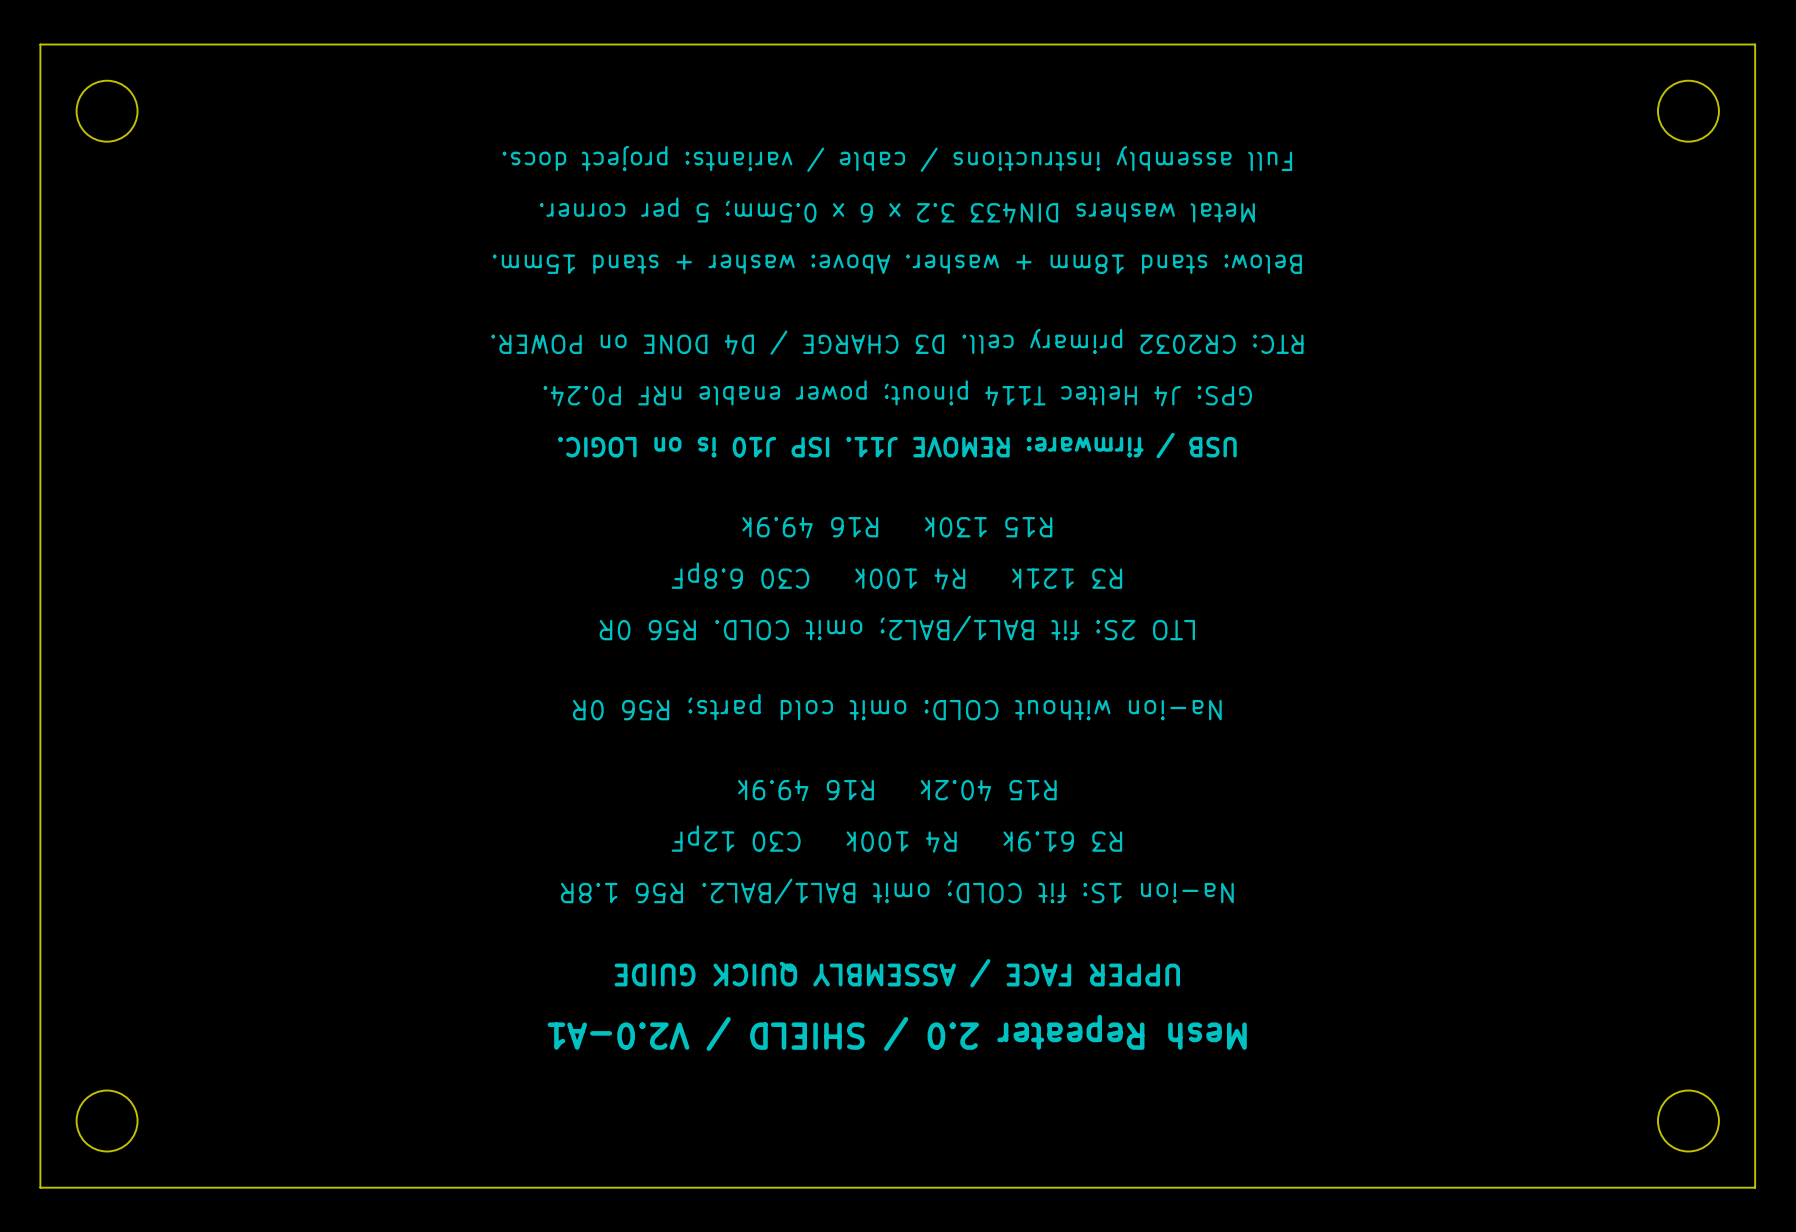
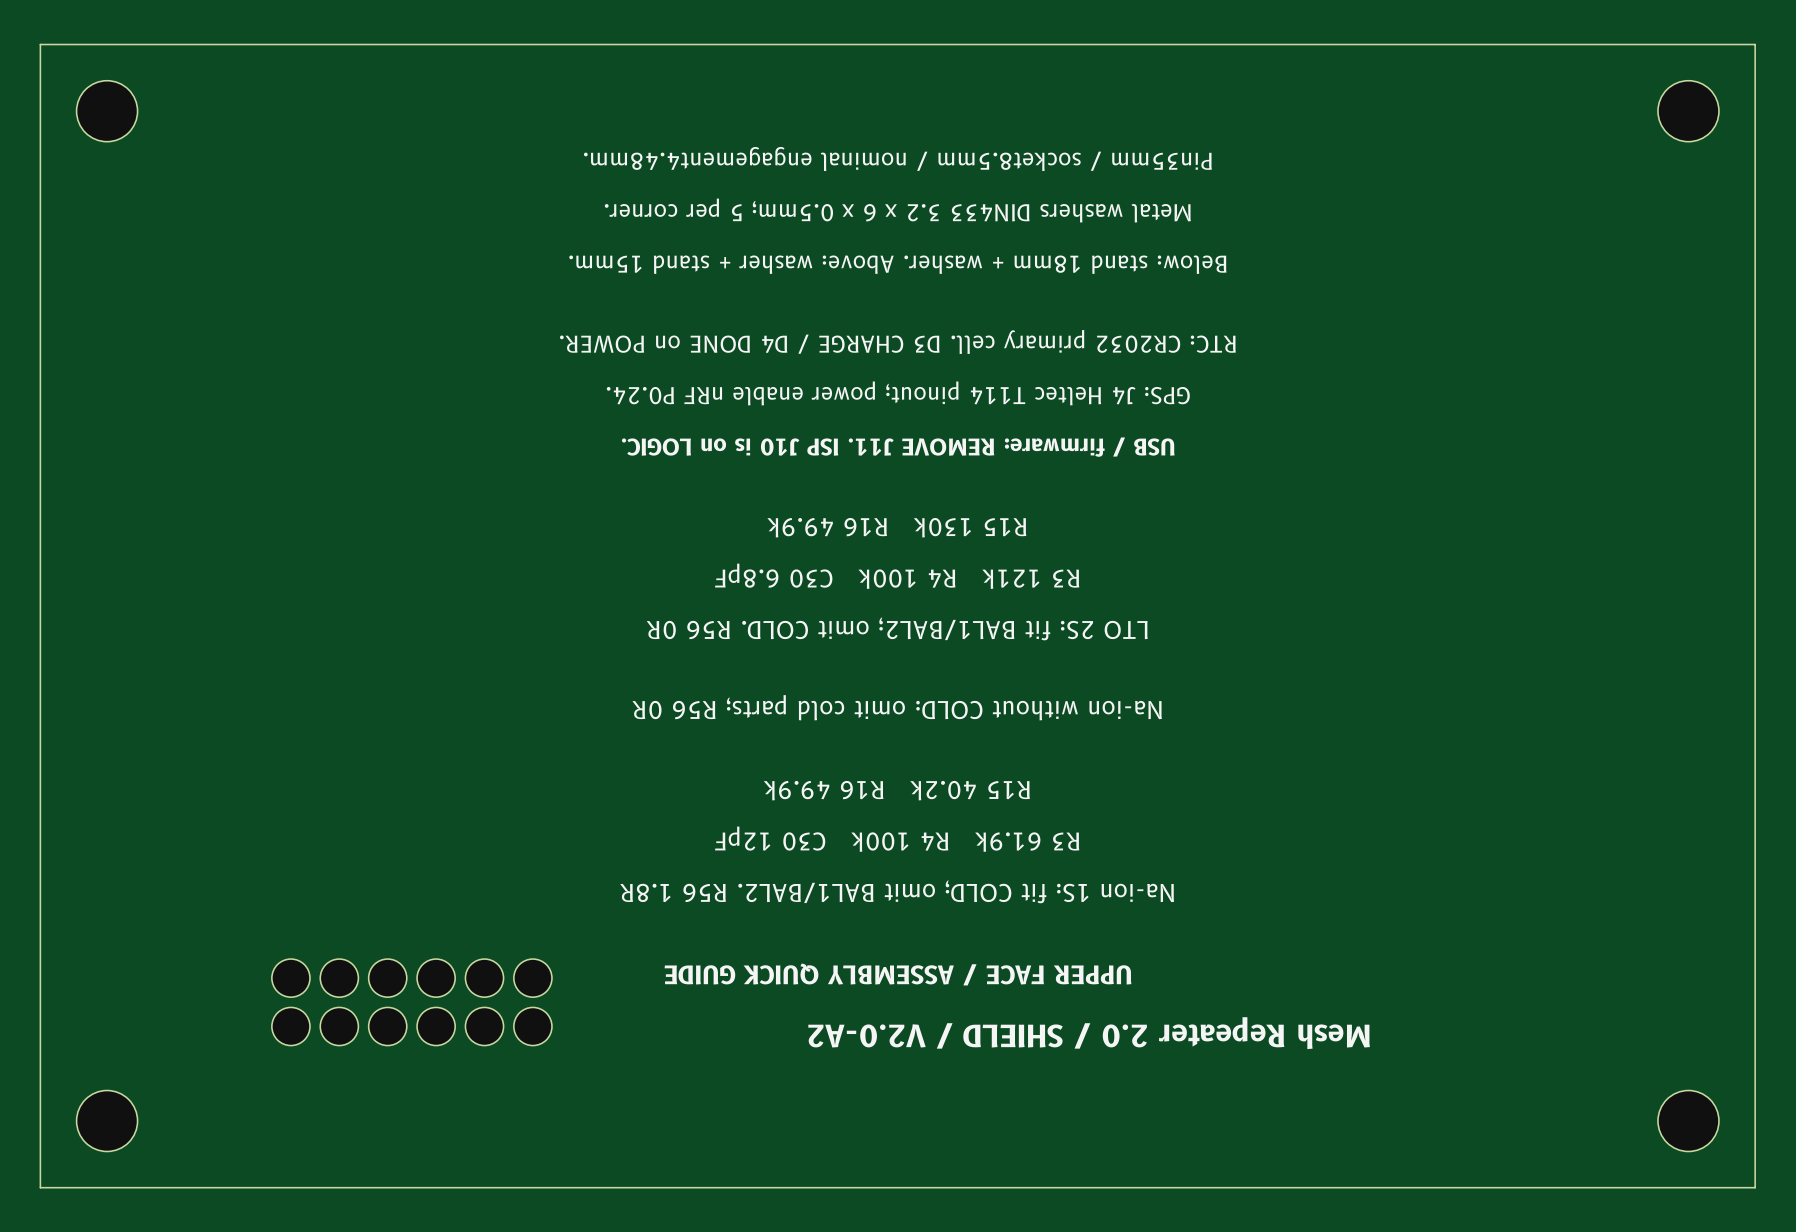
text: Full assembly instructions / cable / variants: project docs. (897, 158) -> Pin35mm / socket8.5mm / nominal engagement4.48mm. (897, 159)
part: none -> (411, 1002)
text: Mesh Repeater 2.0 / SHIELD / V2.0-A1 (897, 1032) -> Mesh Repeater 2.0 / SHIELD / V2.0-A2 (1089, 1033)

